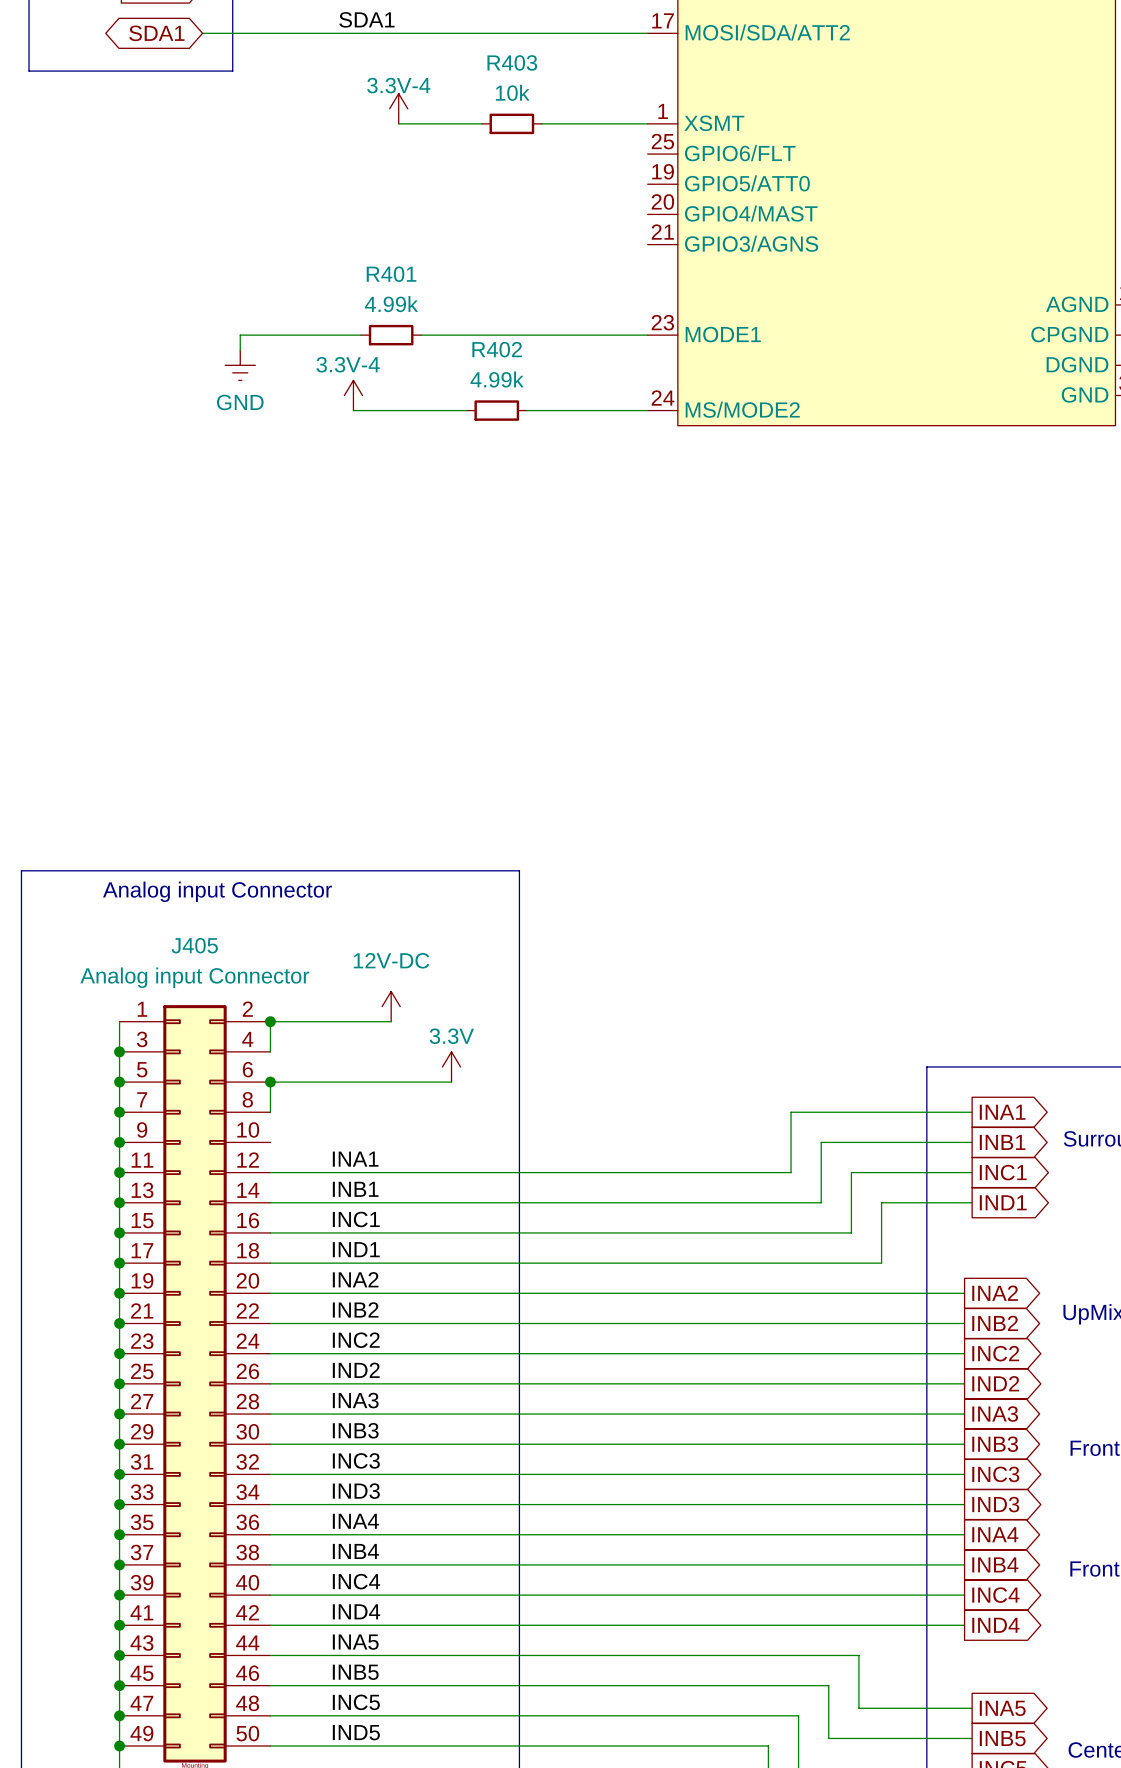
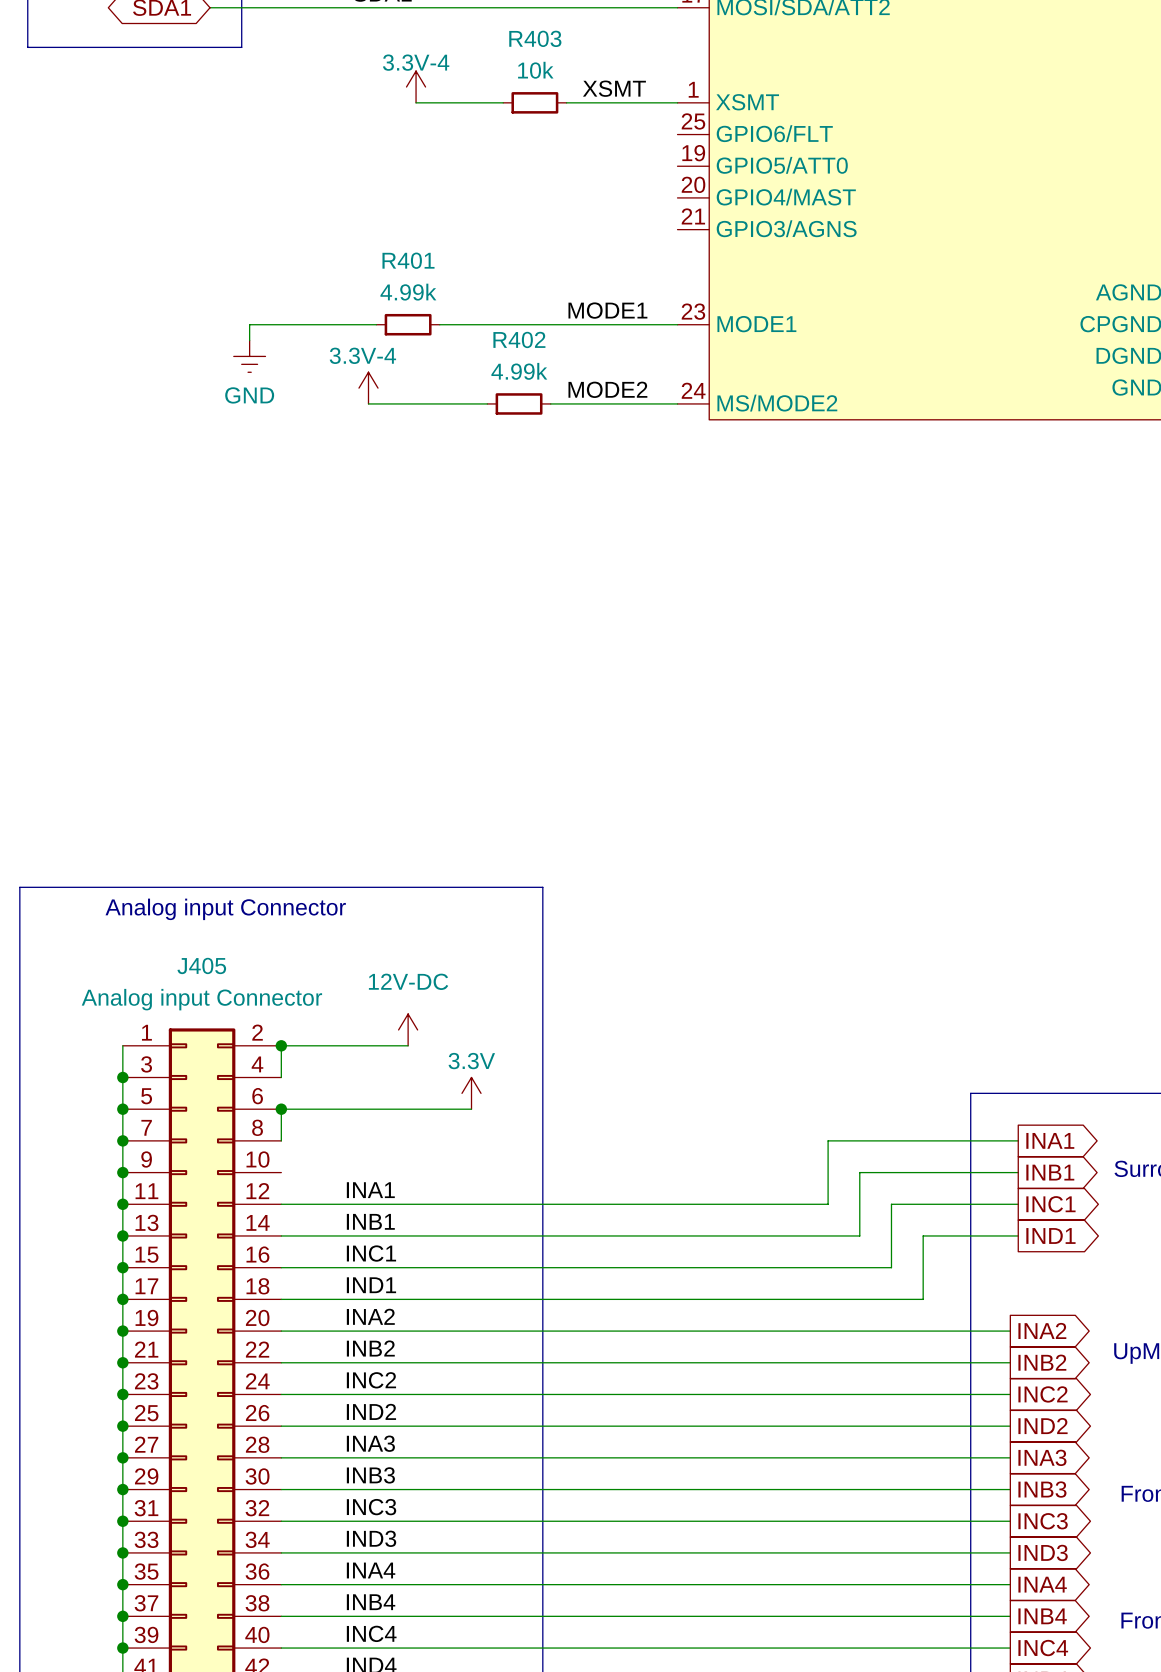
label: none -> XSMT (614, 88)
label: none -> MODE1 (607, 310)
label: none -> MODE2 (607, 389)

